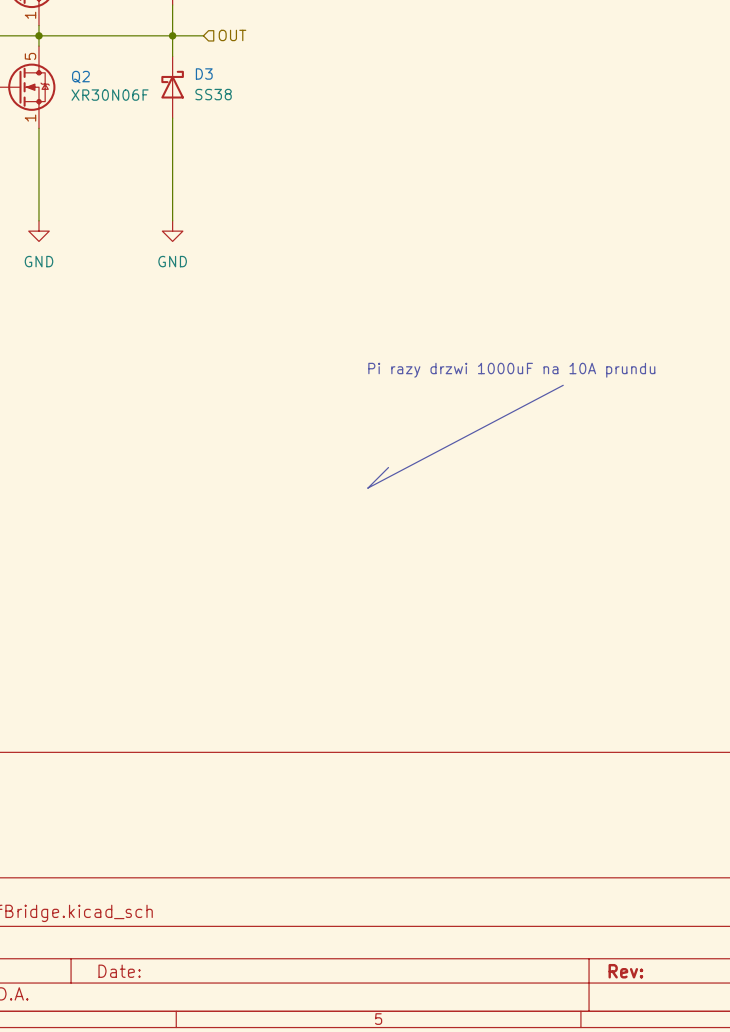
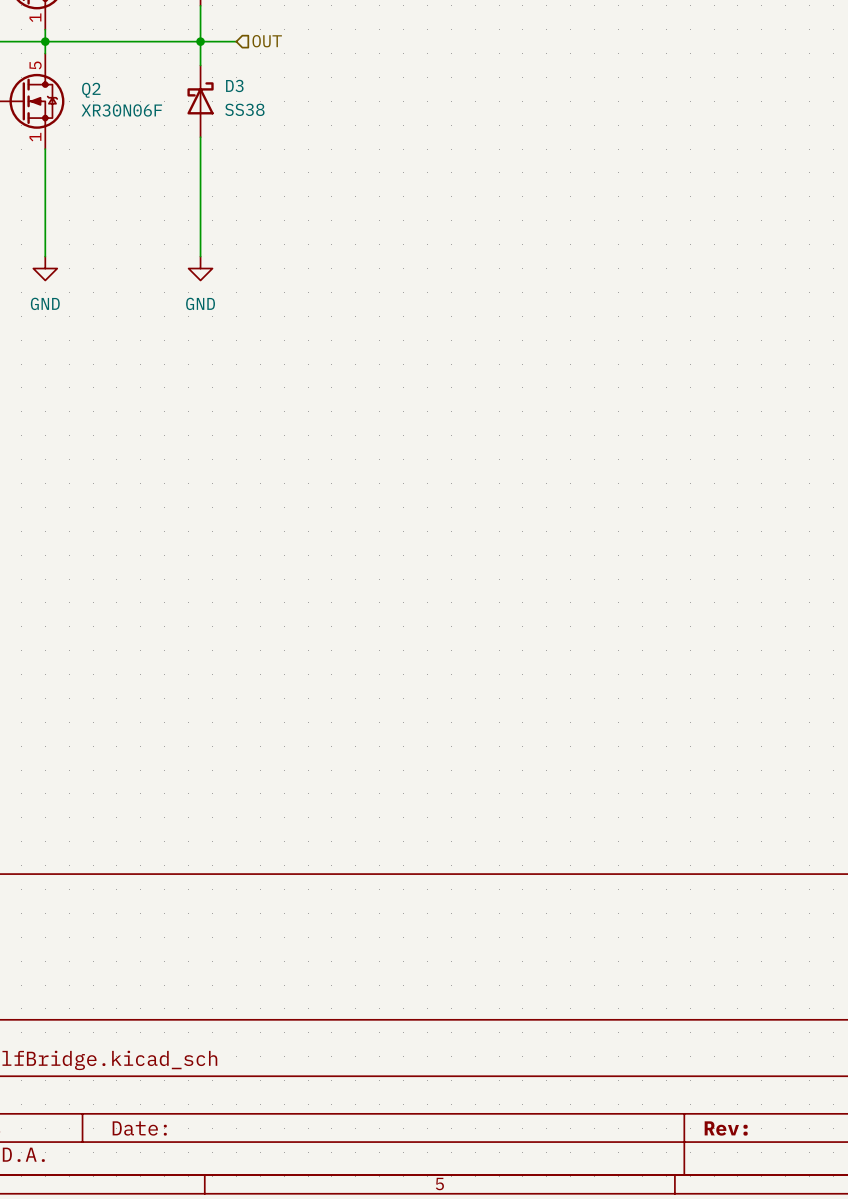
text: Pi razy drzwi 1000uF na 10A prundu (511, 370) -> none
line: (563, 385) (367, 488) (388, 467) -> none

